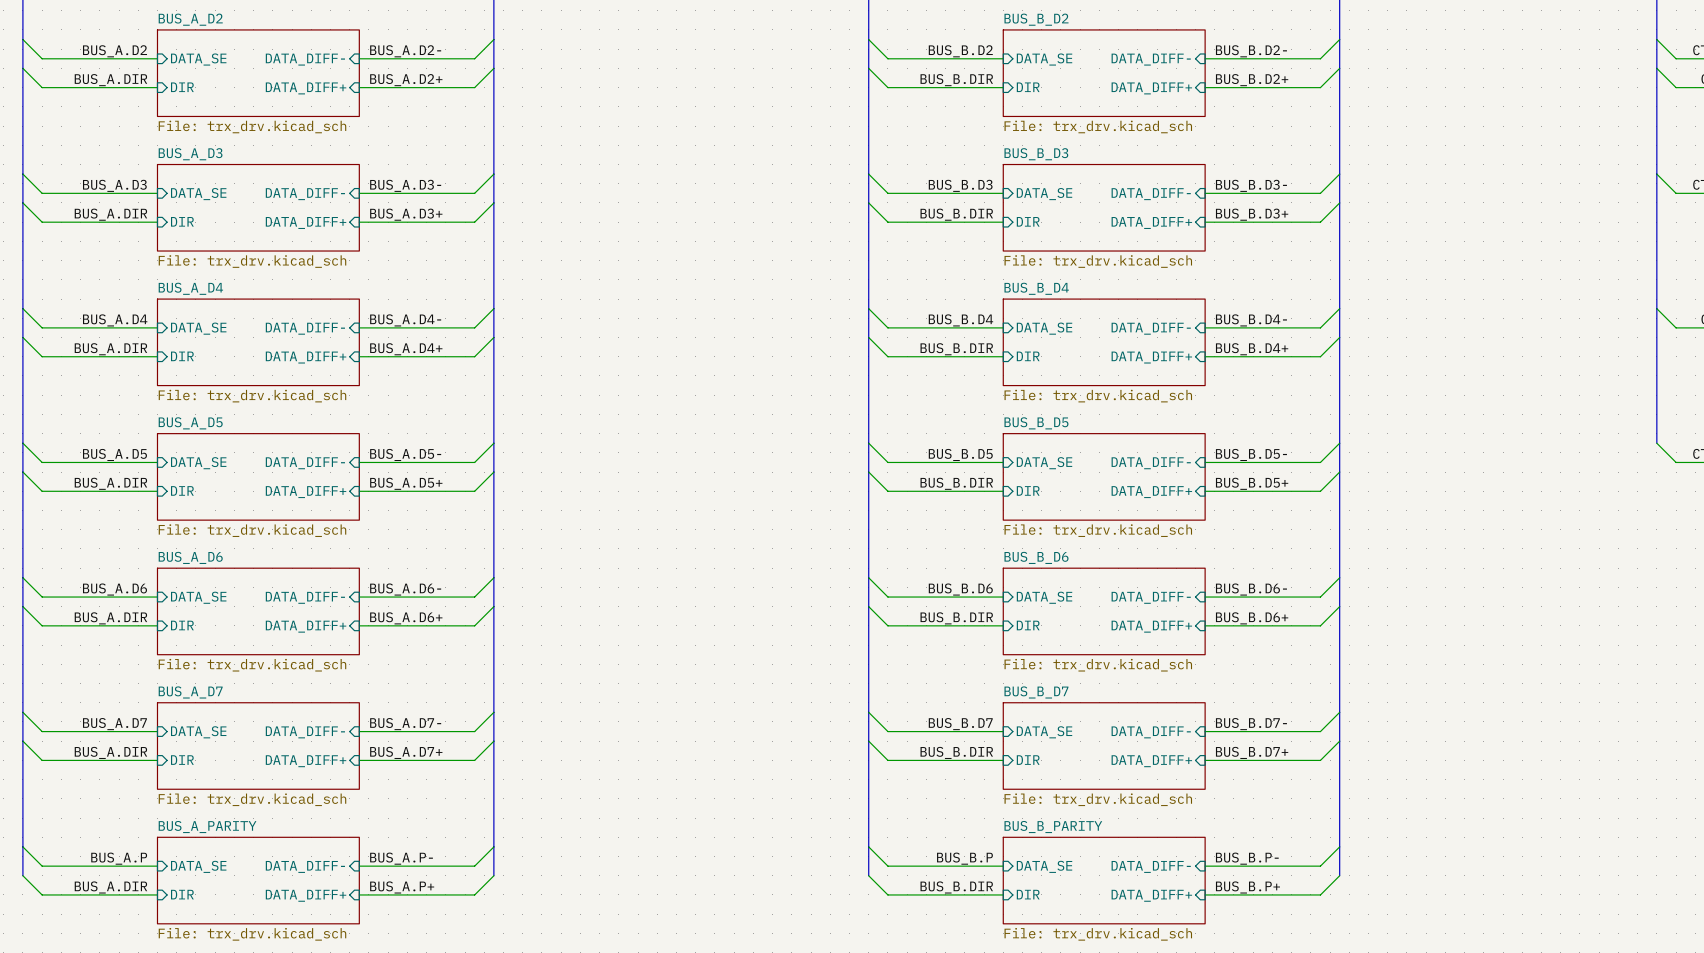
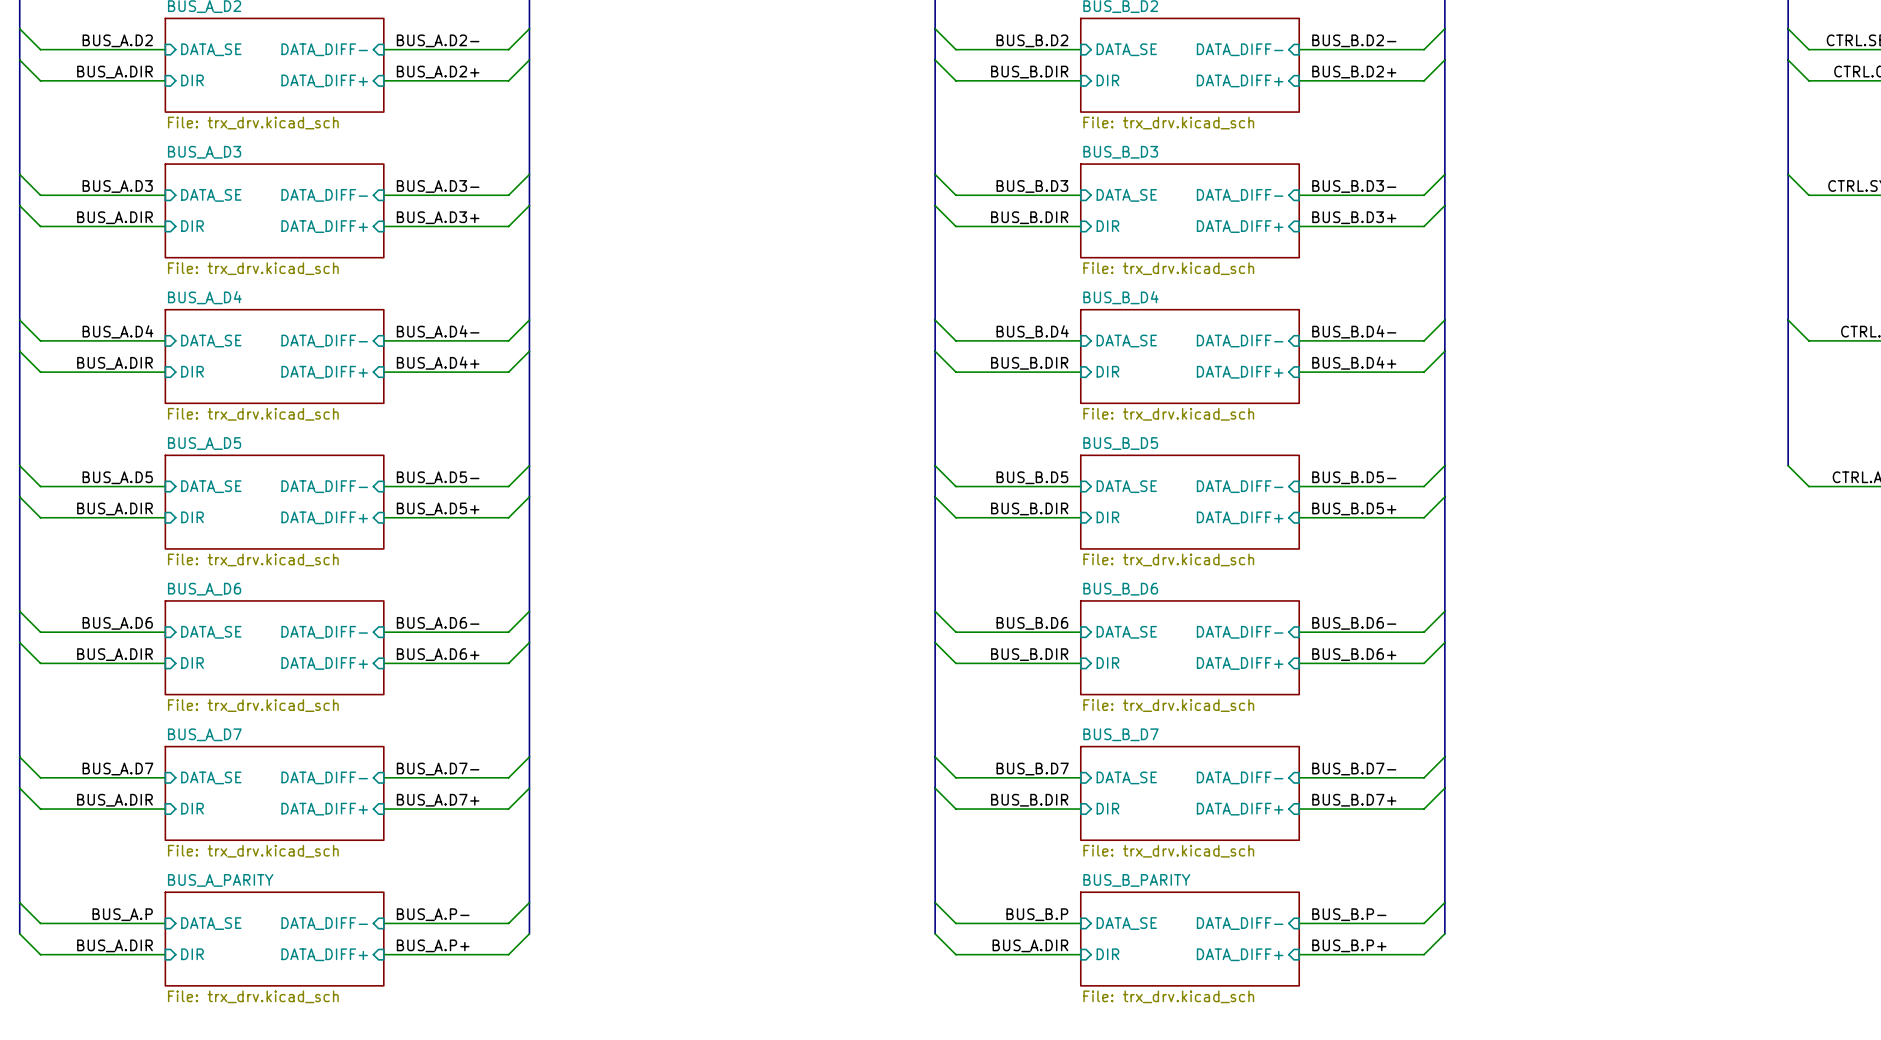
label: BUS_B.DIR (956, 887) -> BUS_A.DIR (1030, 945)

